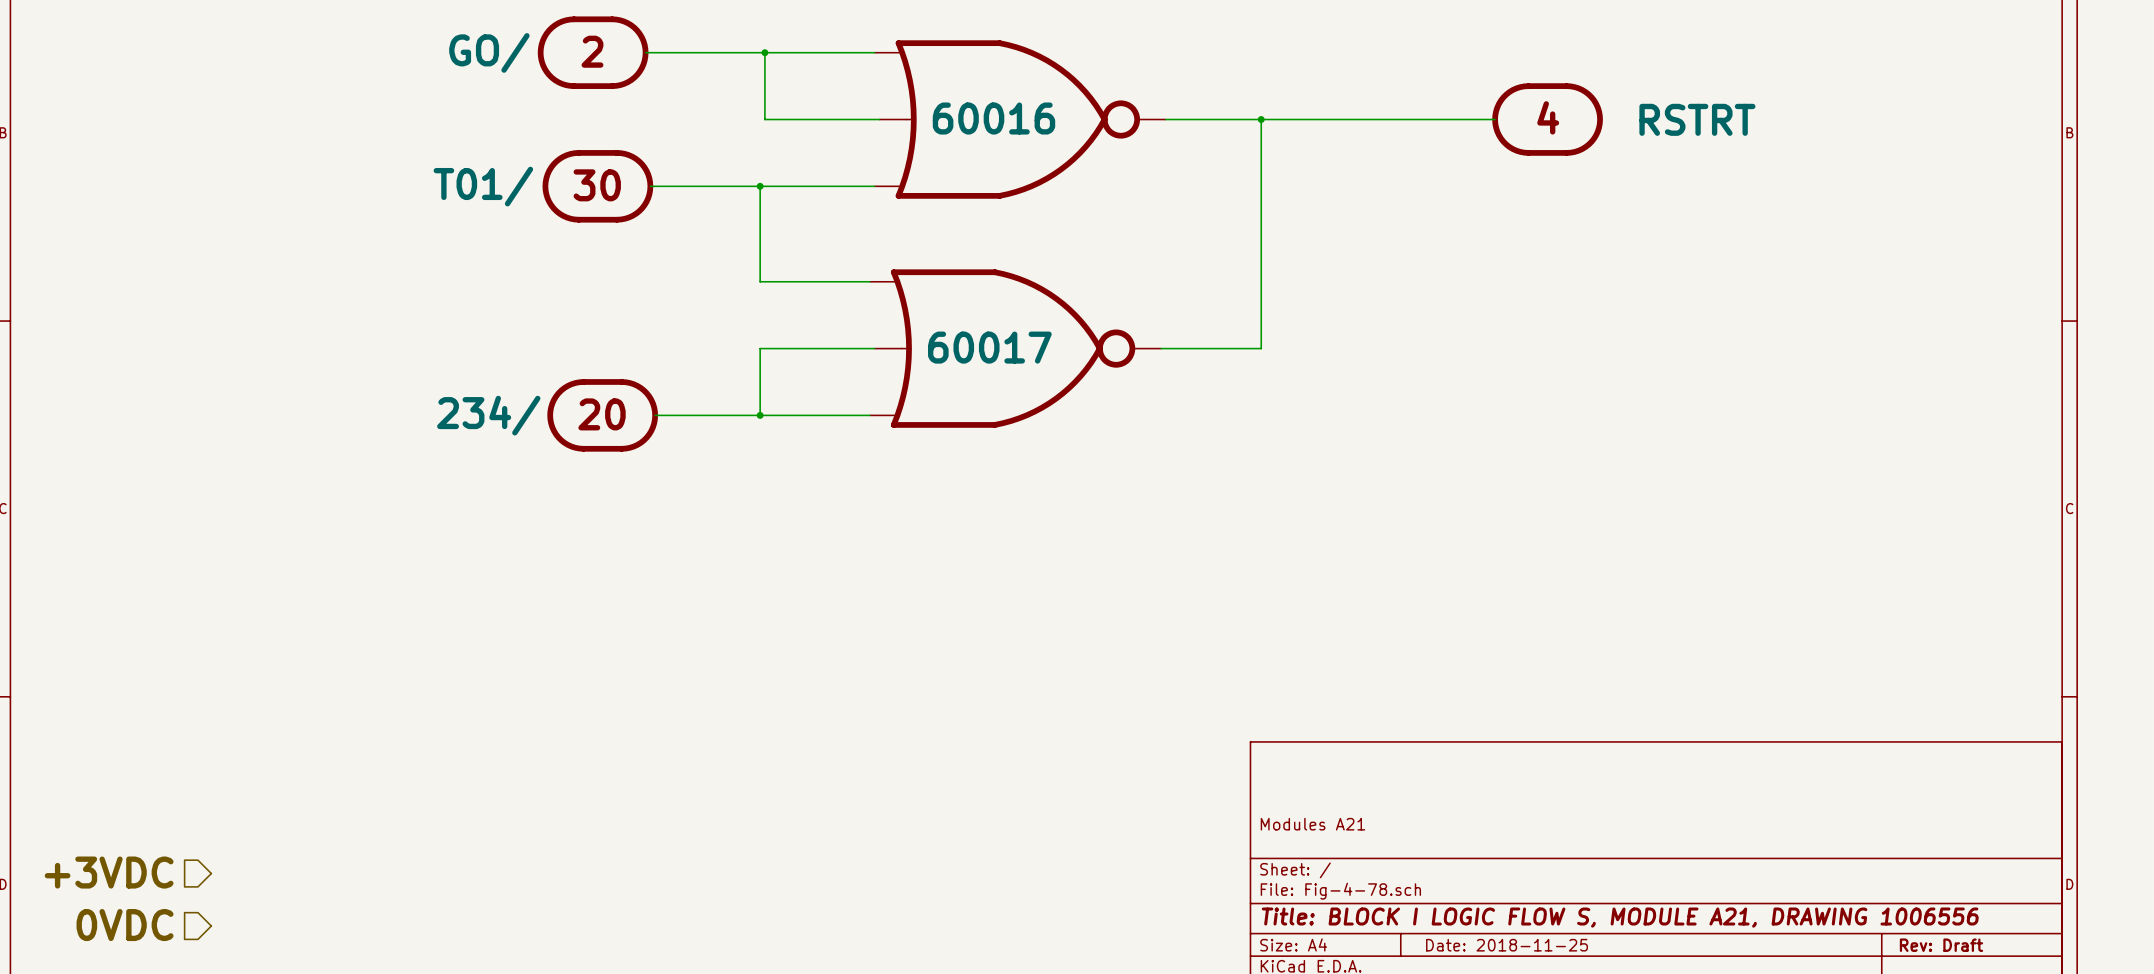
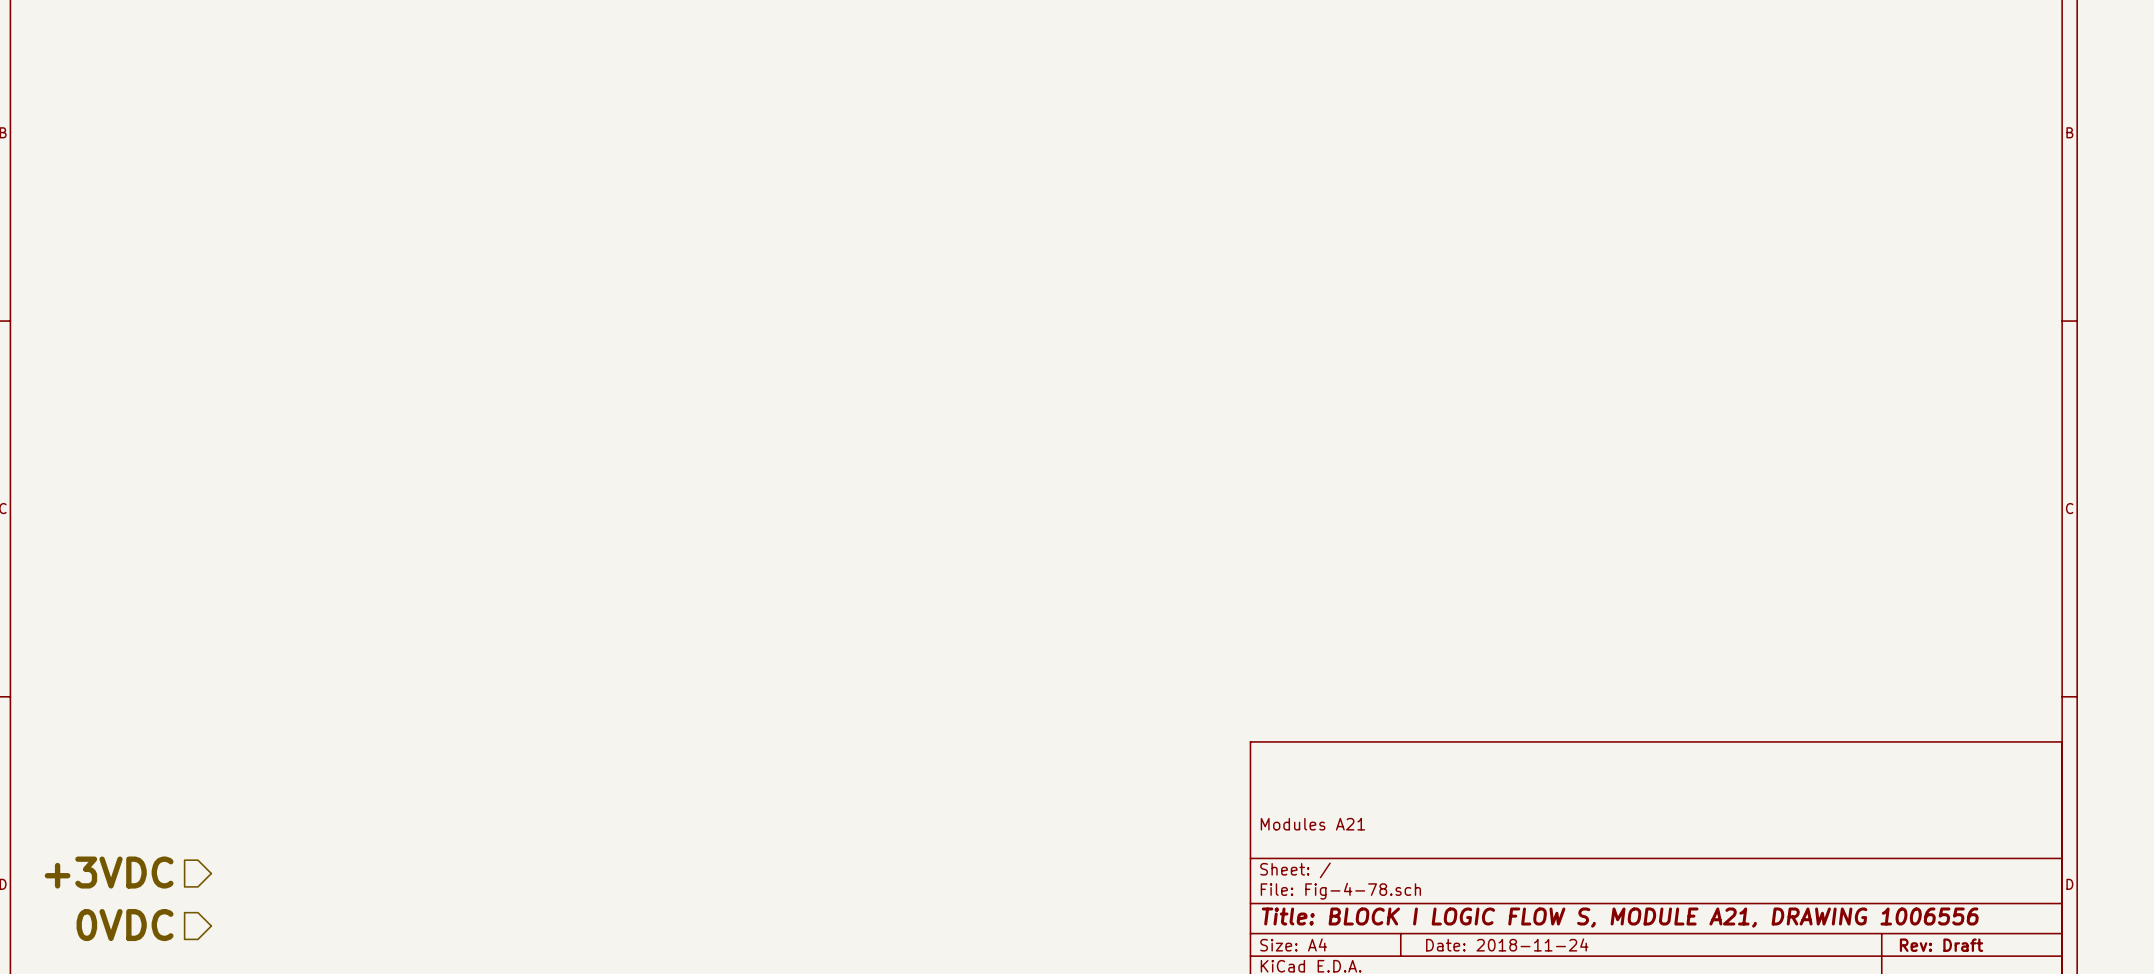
part: (593, 52) -> none
wire: (645, 52) (874, 52) -> none
wire: (764, 52) (764, 119) (879, 119) -> none
junction: (764, 52) -> none
part: (1020, 119) -> none
wire: (1165, 119) (1495, 119) -> none
wire: (1261, 119) (1261, 348) (1161, 348) -> none
junction: (1261, 119) -> none
part: (1547, 119) -> none
part: (597, 186) -> none
wire: (650, 186) (874, 186) -> none
wire: (760, 186) (760, 281) (869, 281) -> none
junction: (760, 186) -> none
wire: (874, 348) (760, 348) (760, 415) -> none
part: (1015, 348) -> none
part: (602, 415) -> none
wire: (655, 415) (869, 415) -> none
junction: (760, 415) -> none
title block: Date: 2018-11-25 (1507, 945) -> Date: 2018-11-24 (1507, 944)

